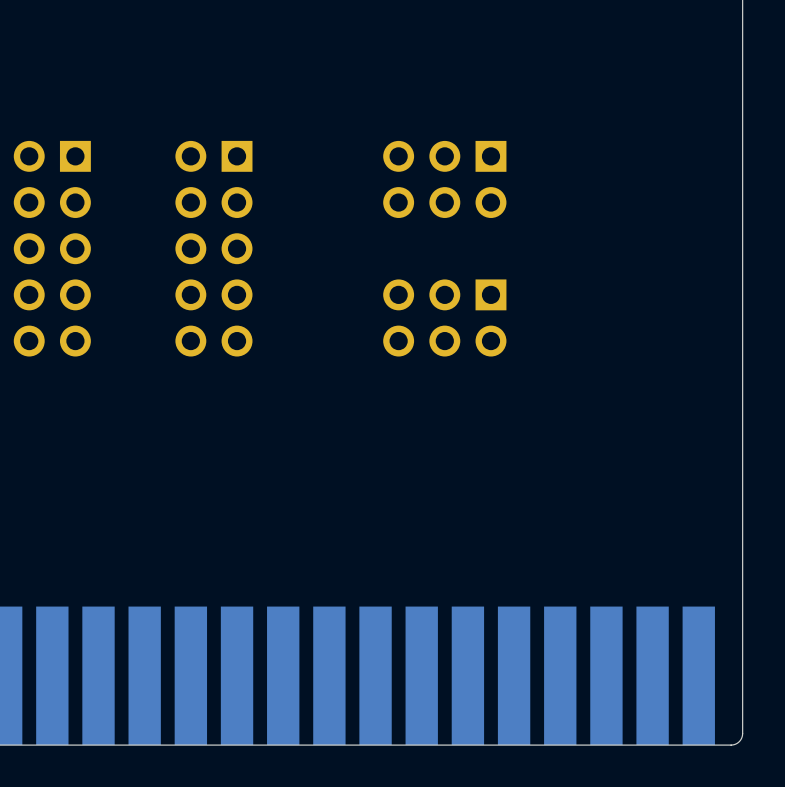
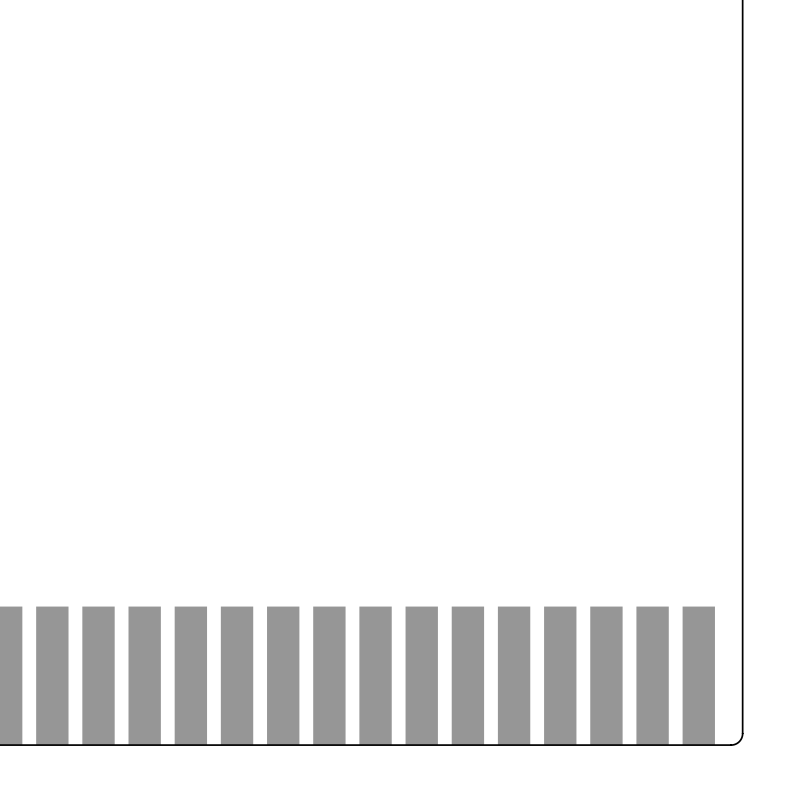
part: (444, 179) -> none
part: (52, 248) -> none
part: (213, 248) -> none
part: (444, 317) -> none

